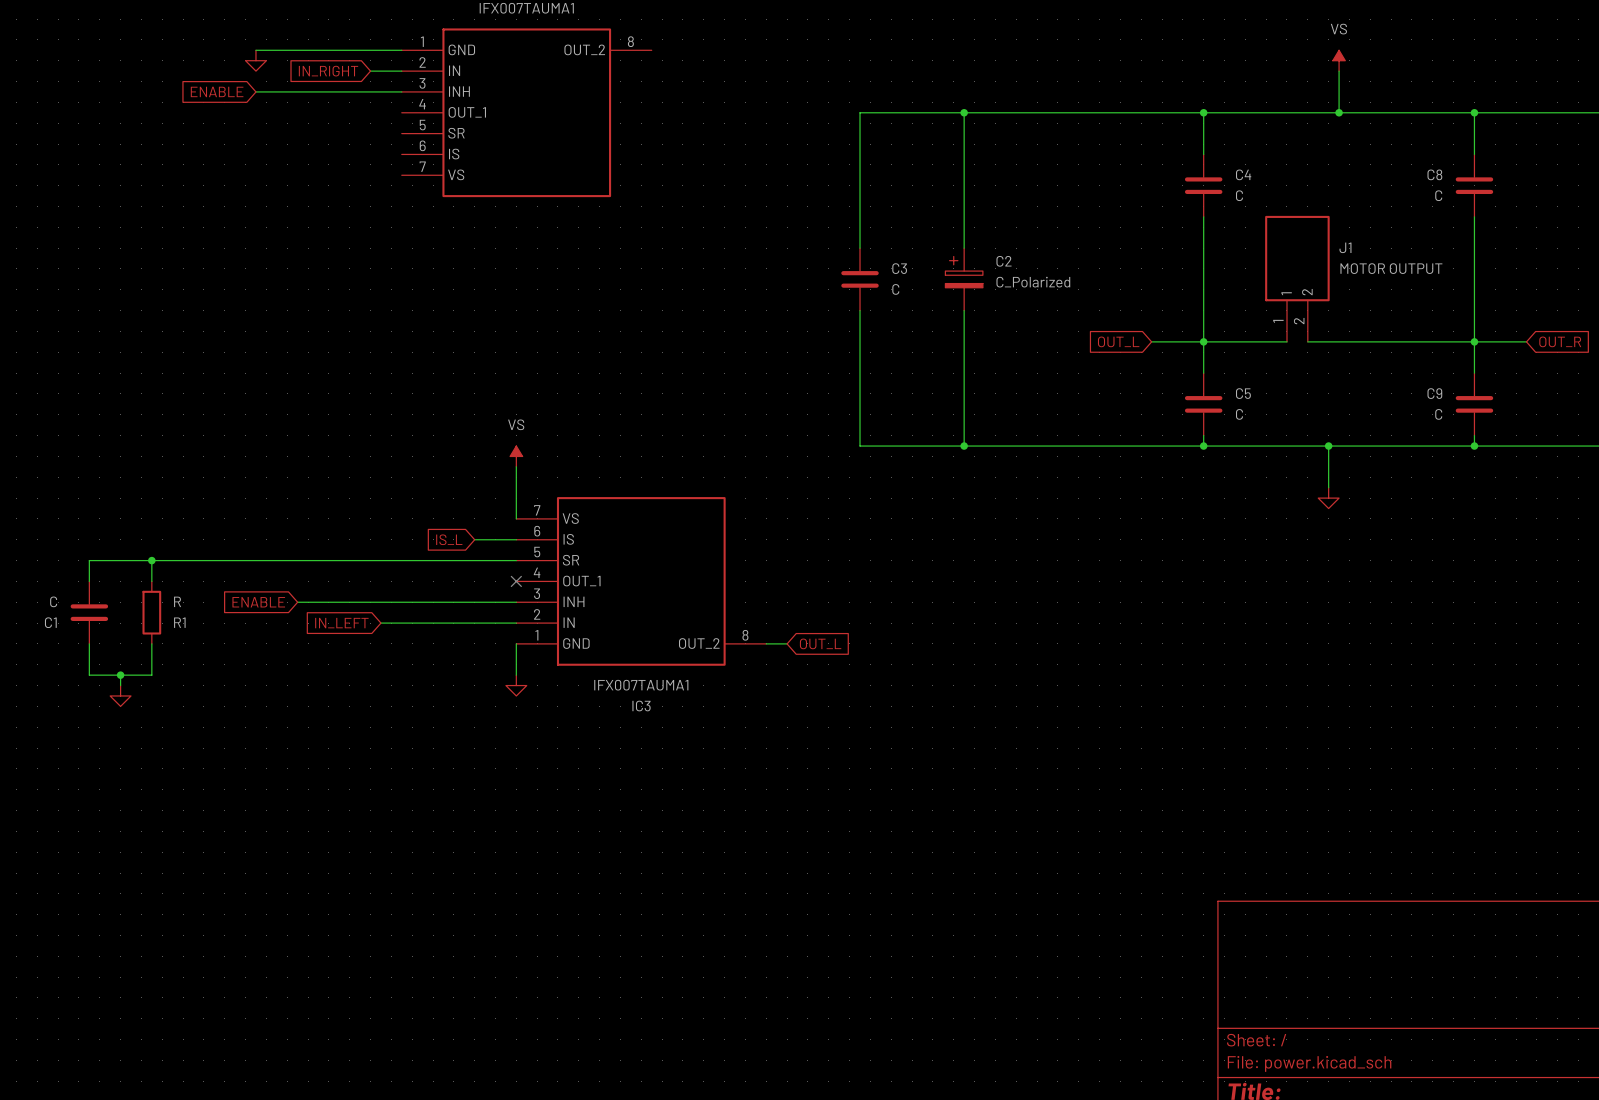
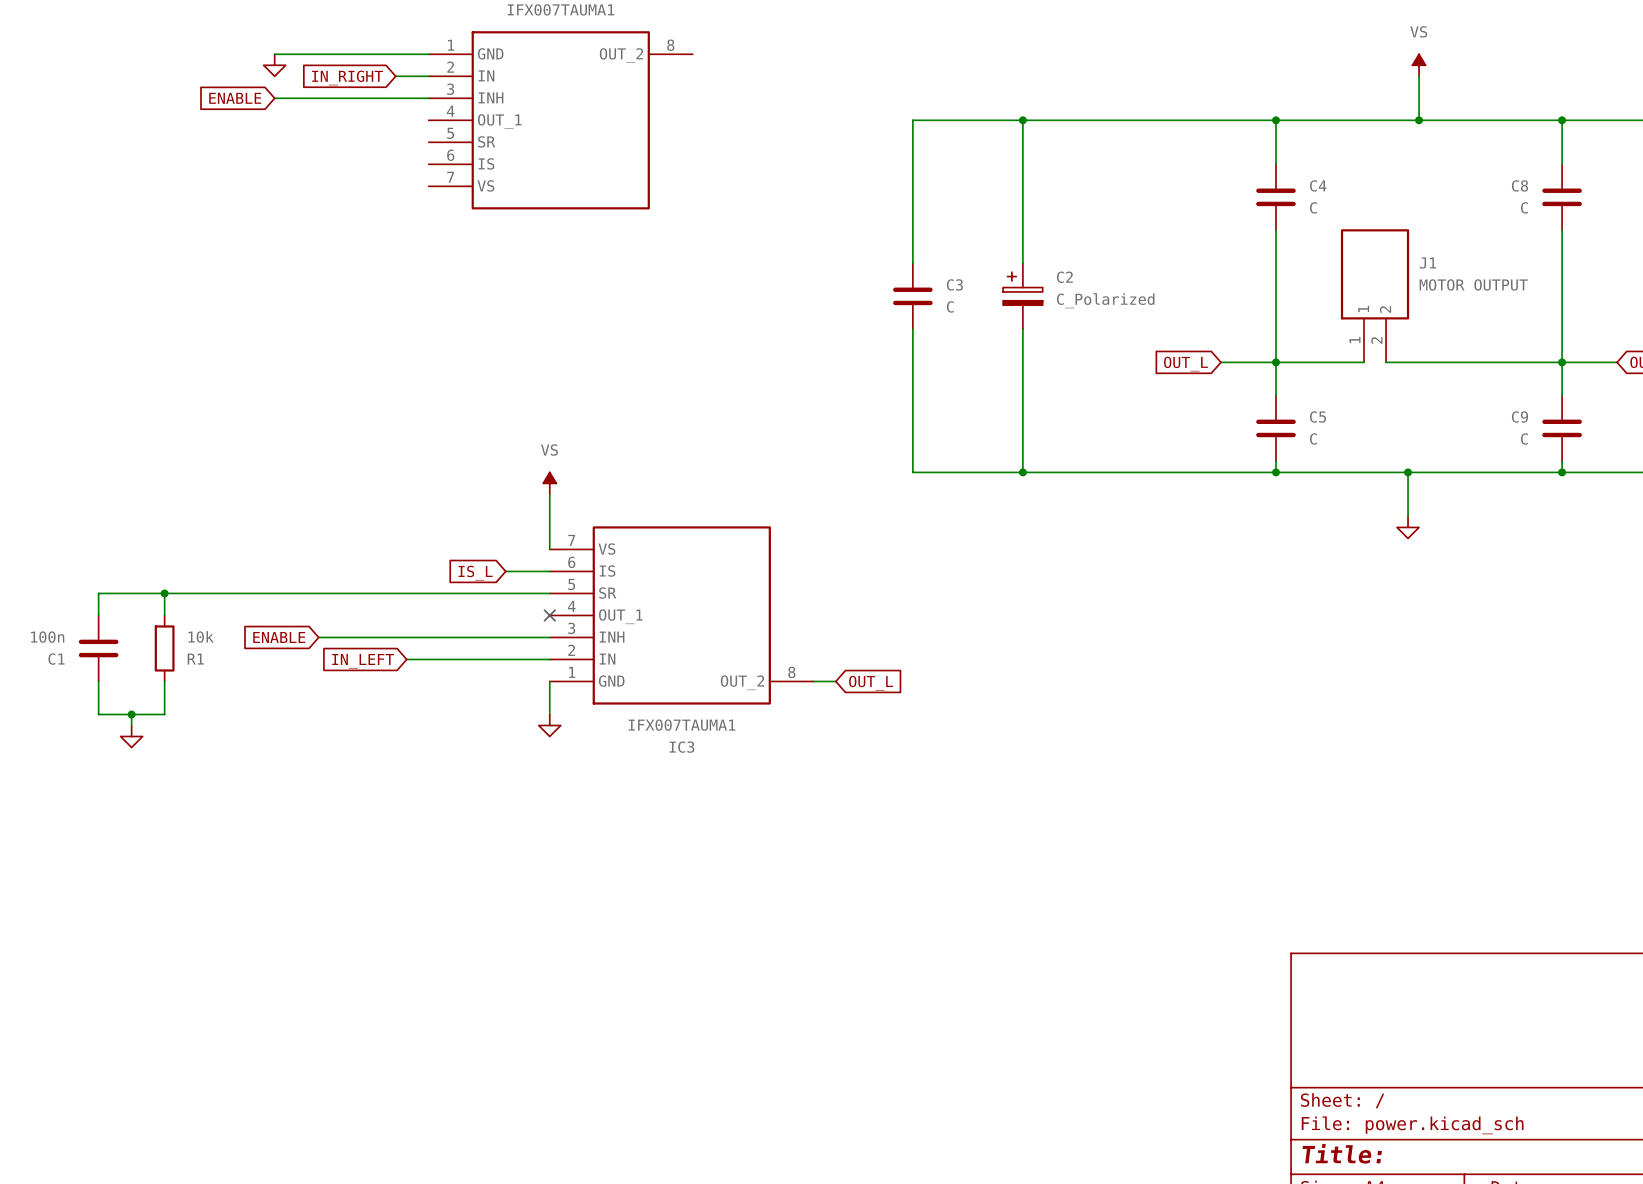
C1 value: C (53, 601) -> 100n (47, 637)
R1 value: R (177, 601) -> 10k (201, 636)

